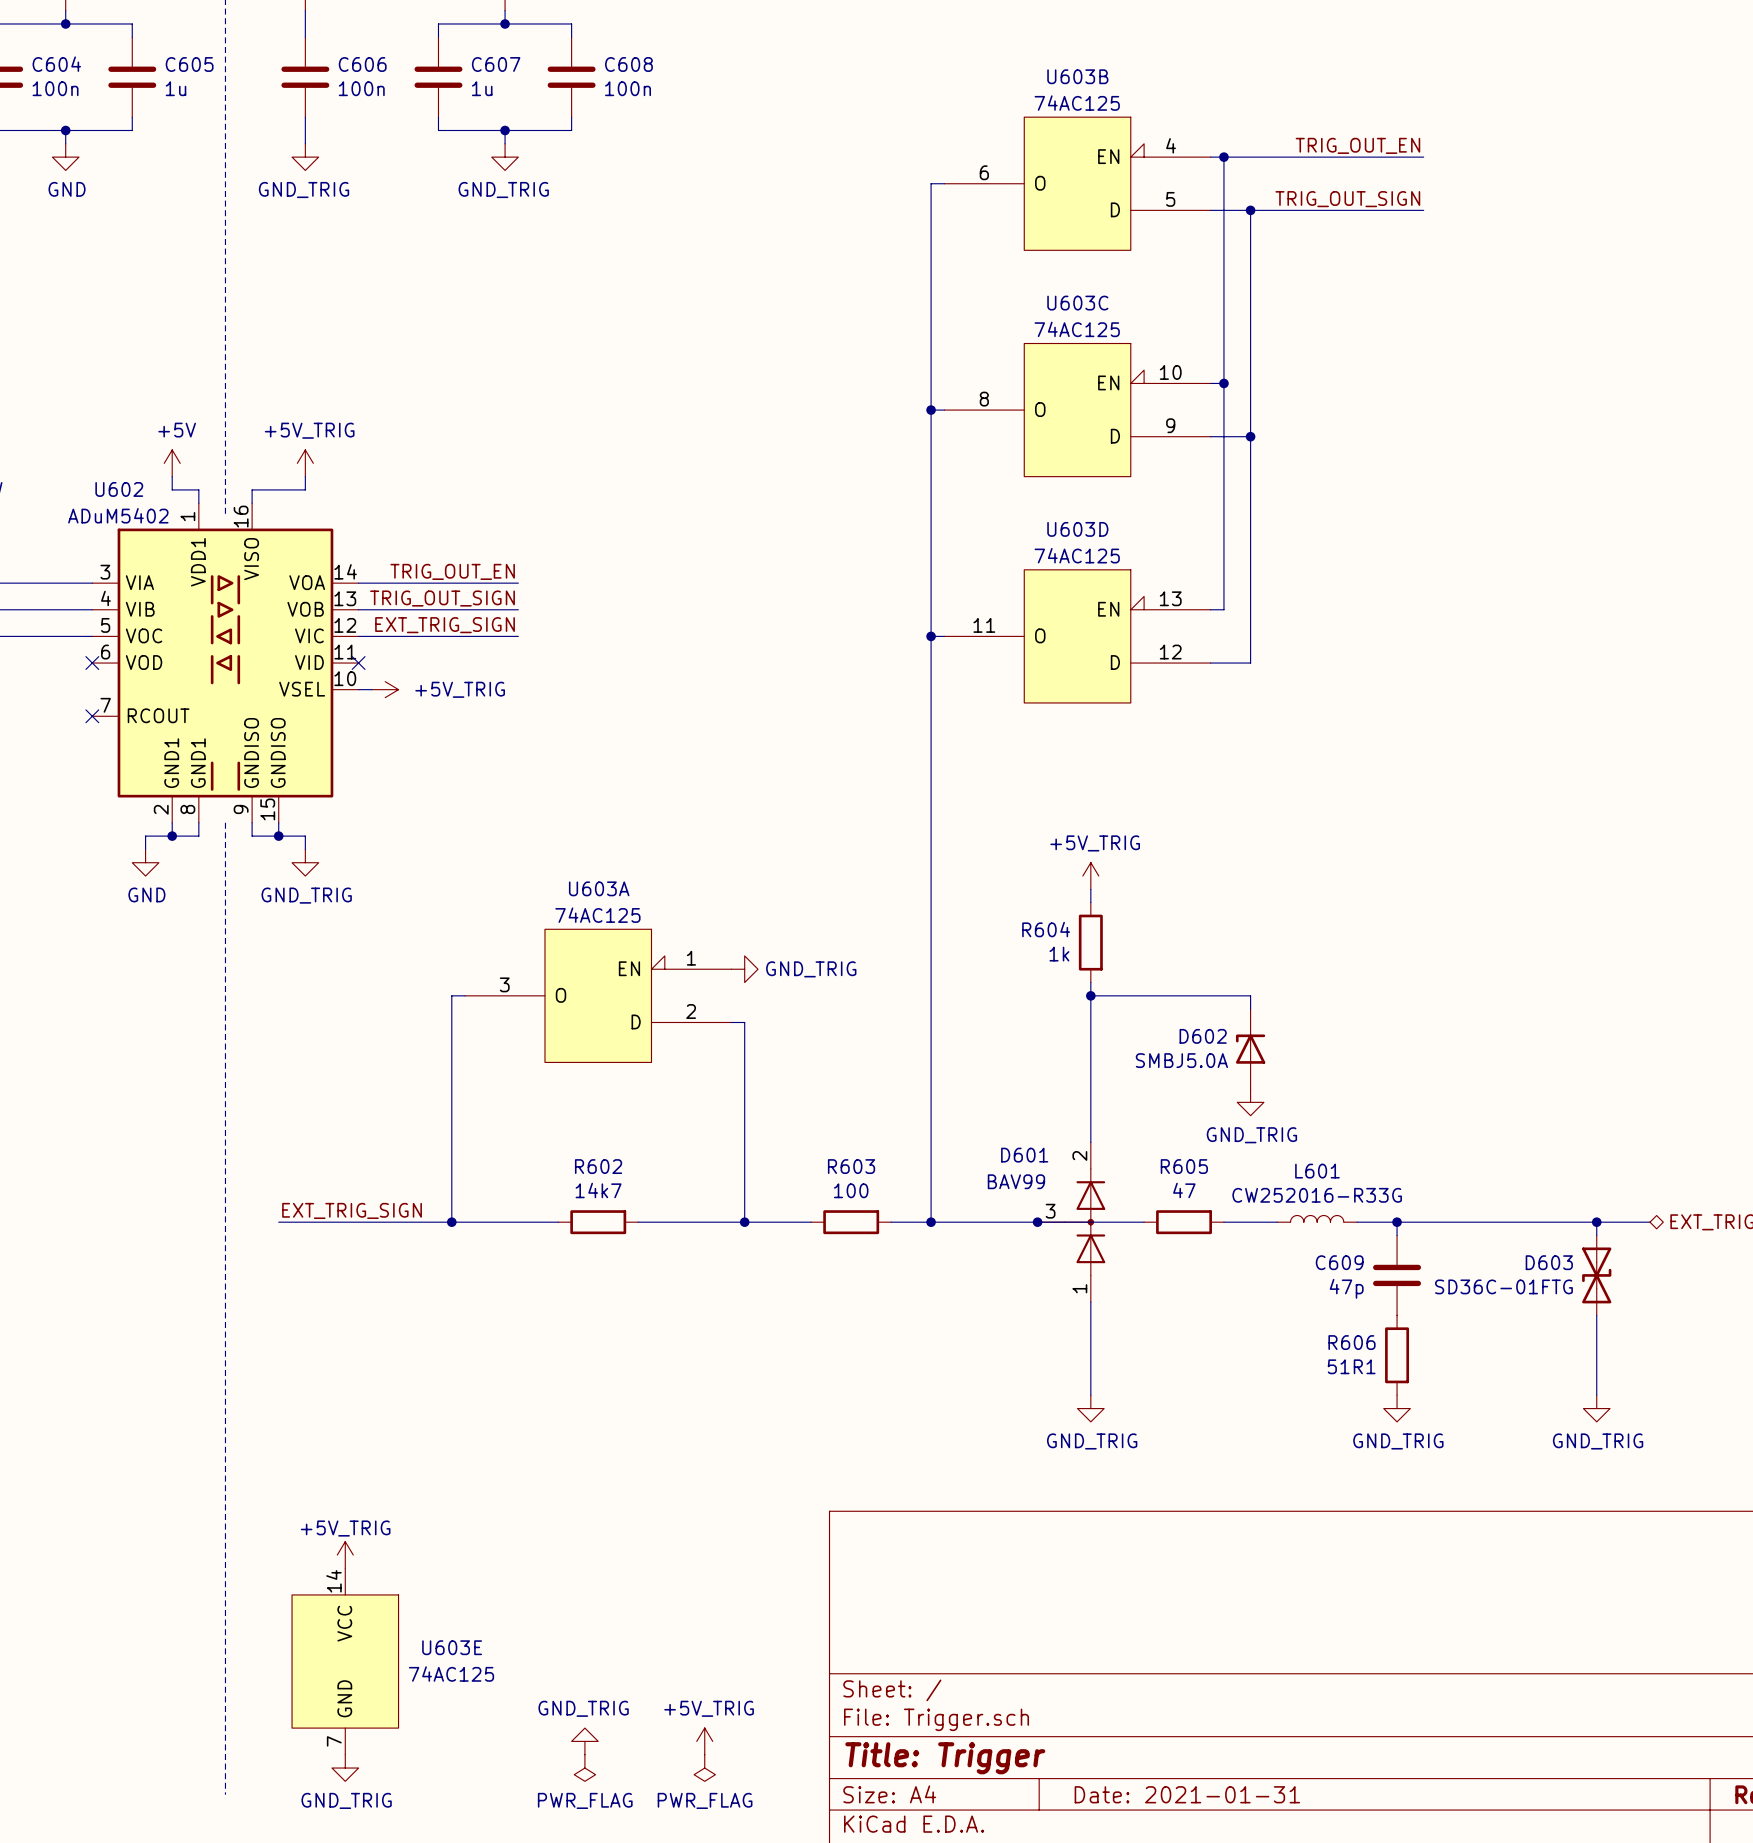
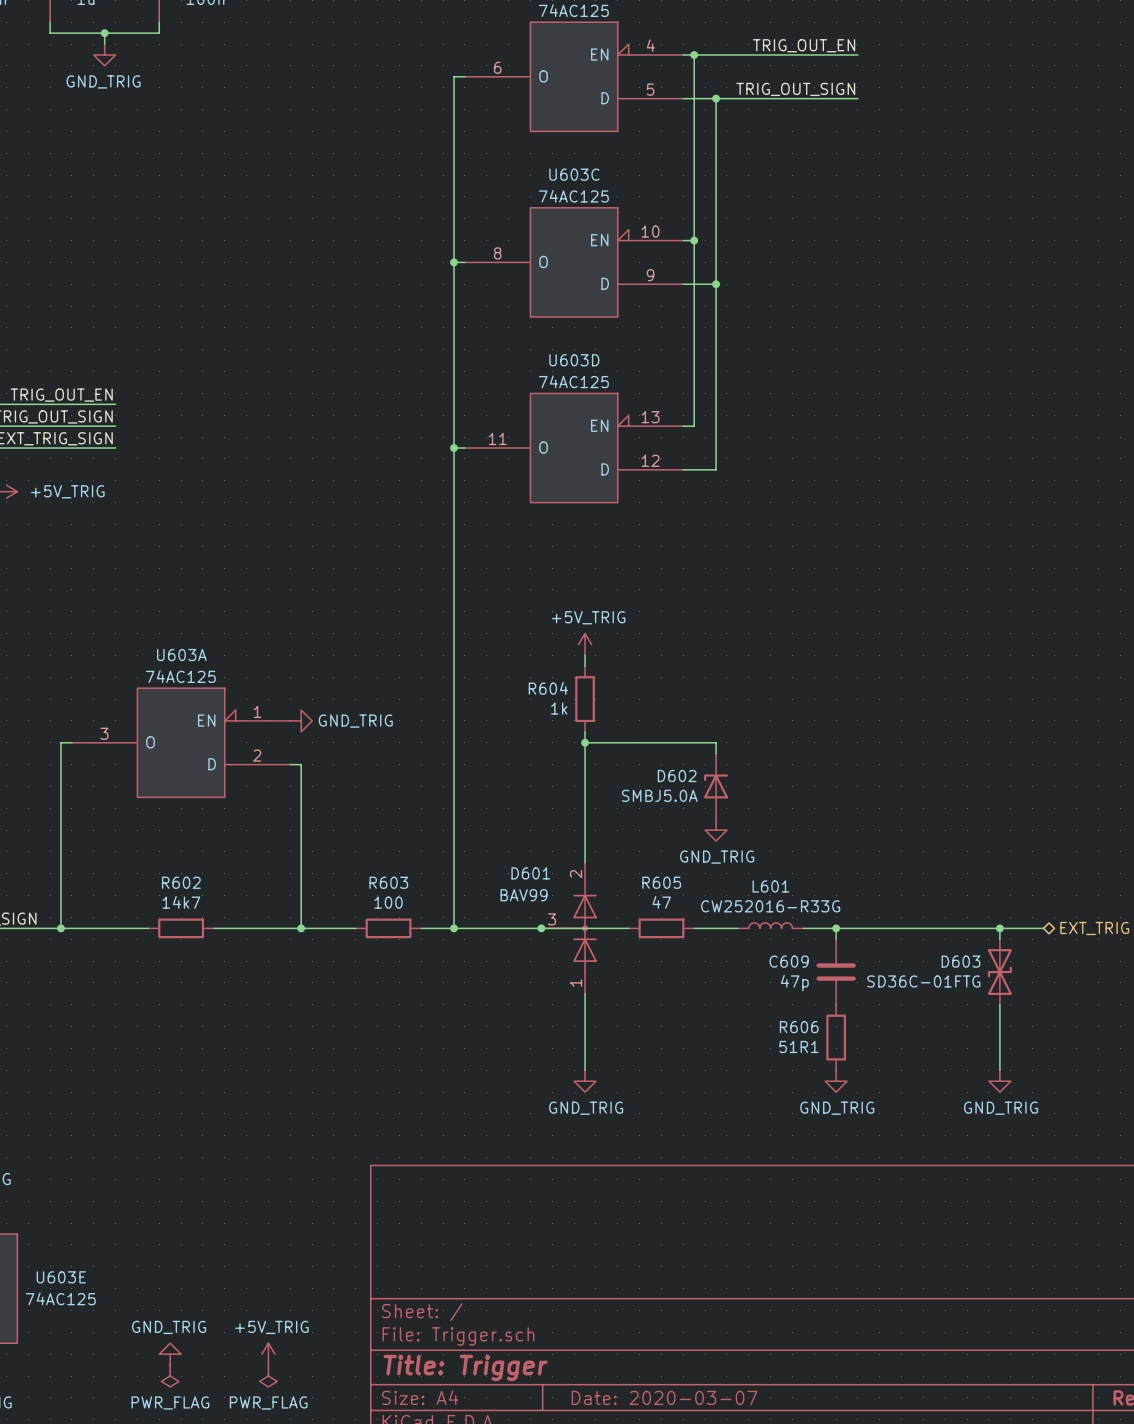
title block: Date: 2021-01-31 (1187, 1794) -> Date: 2020-03-07 (664, 1397)

